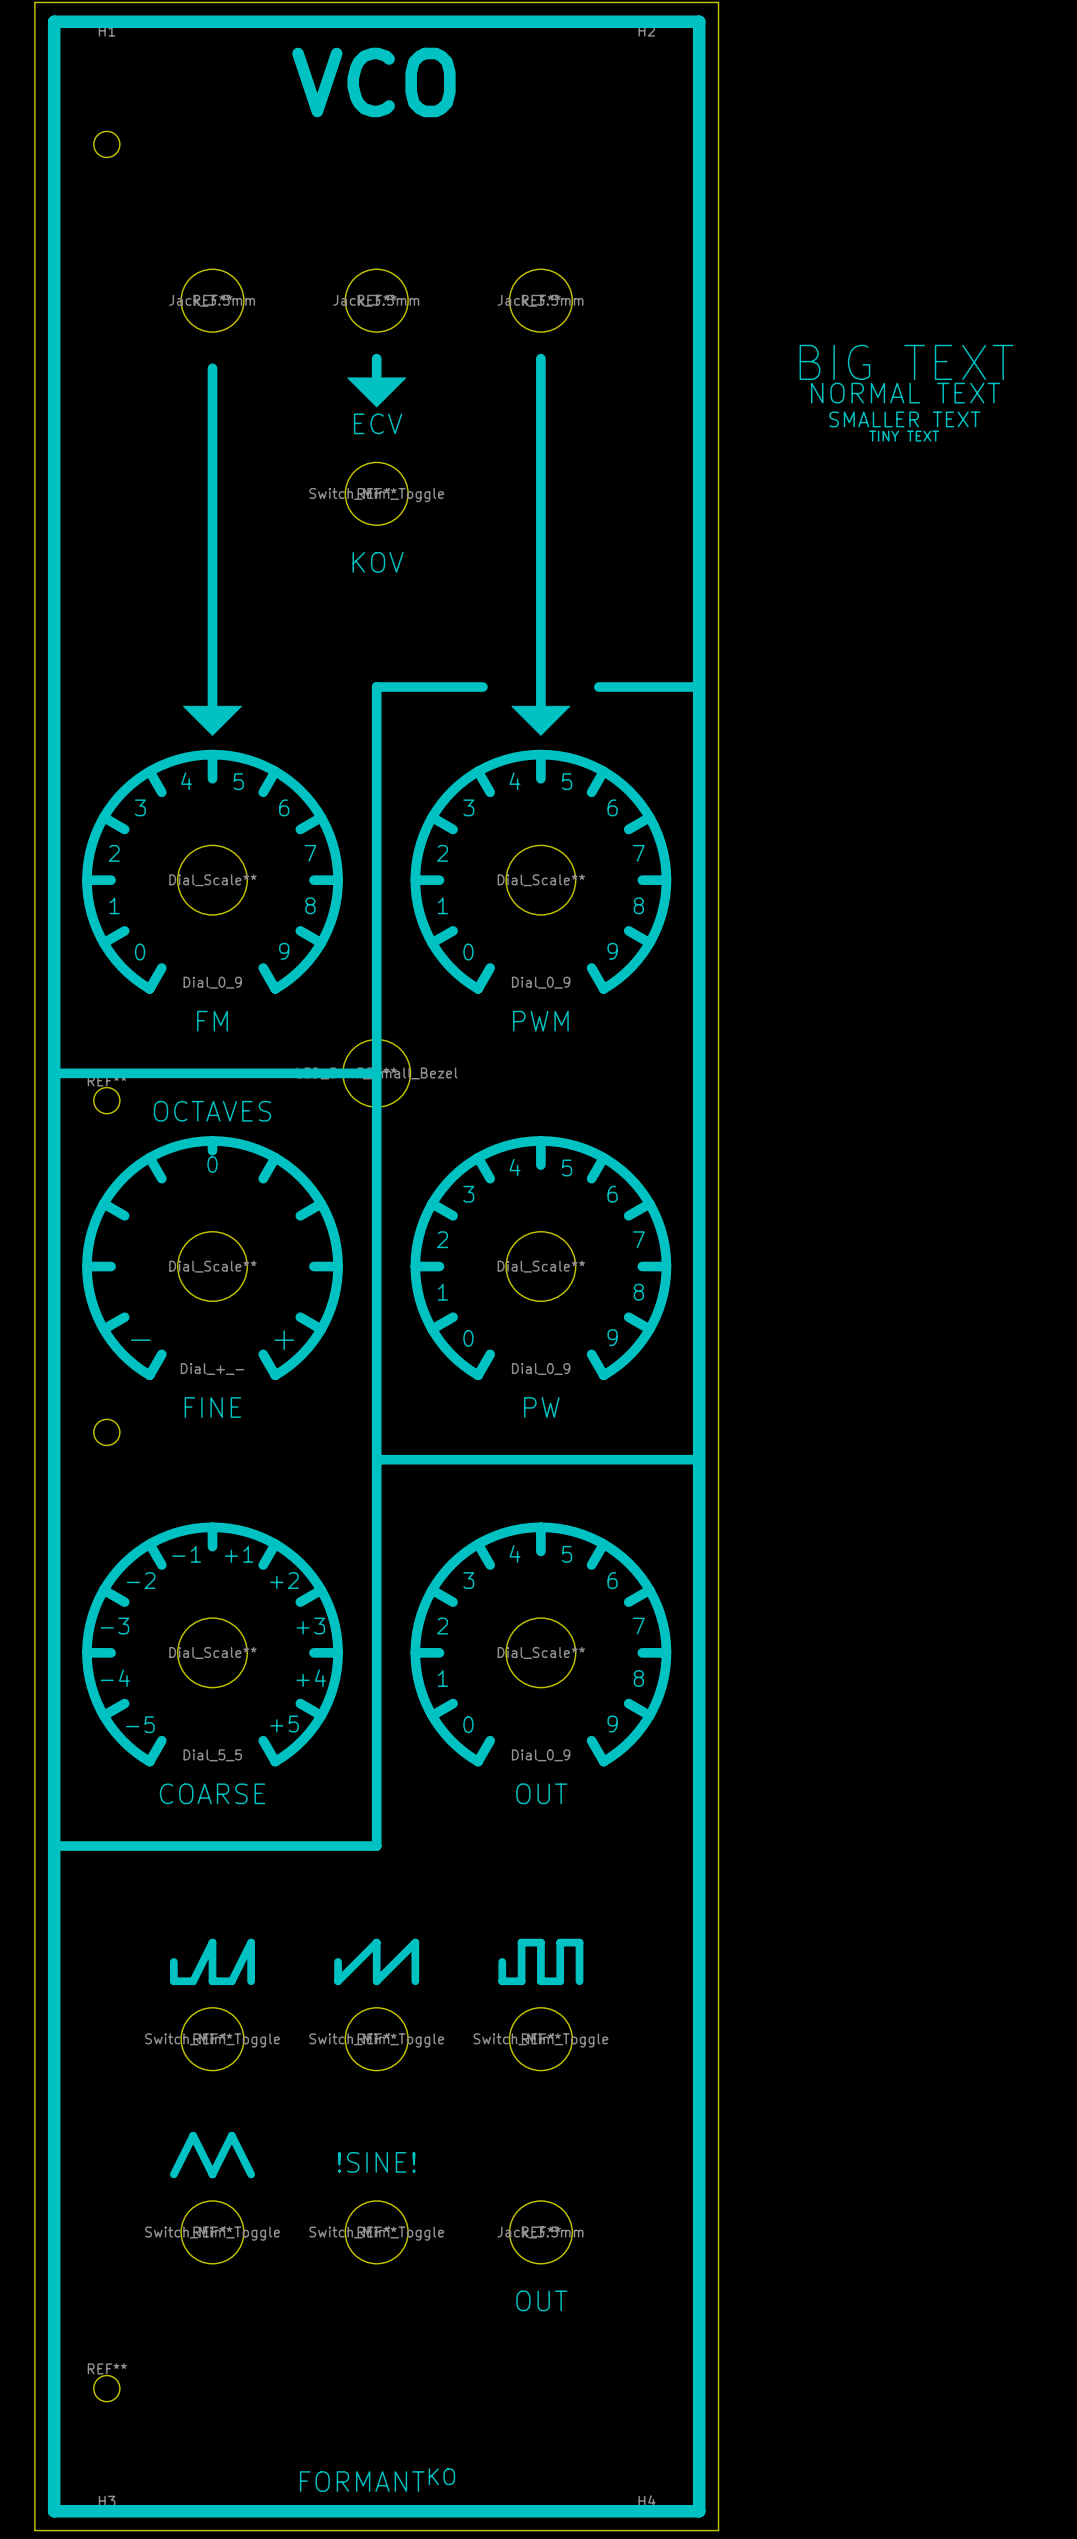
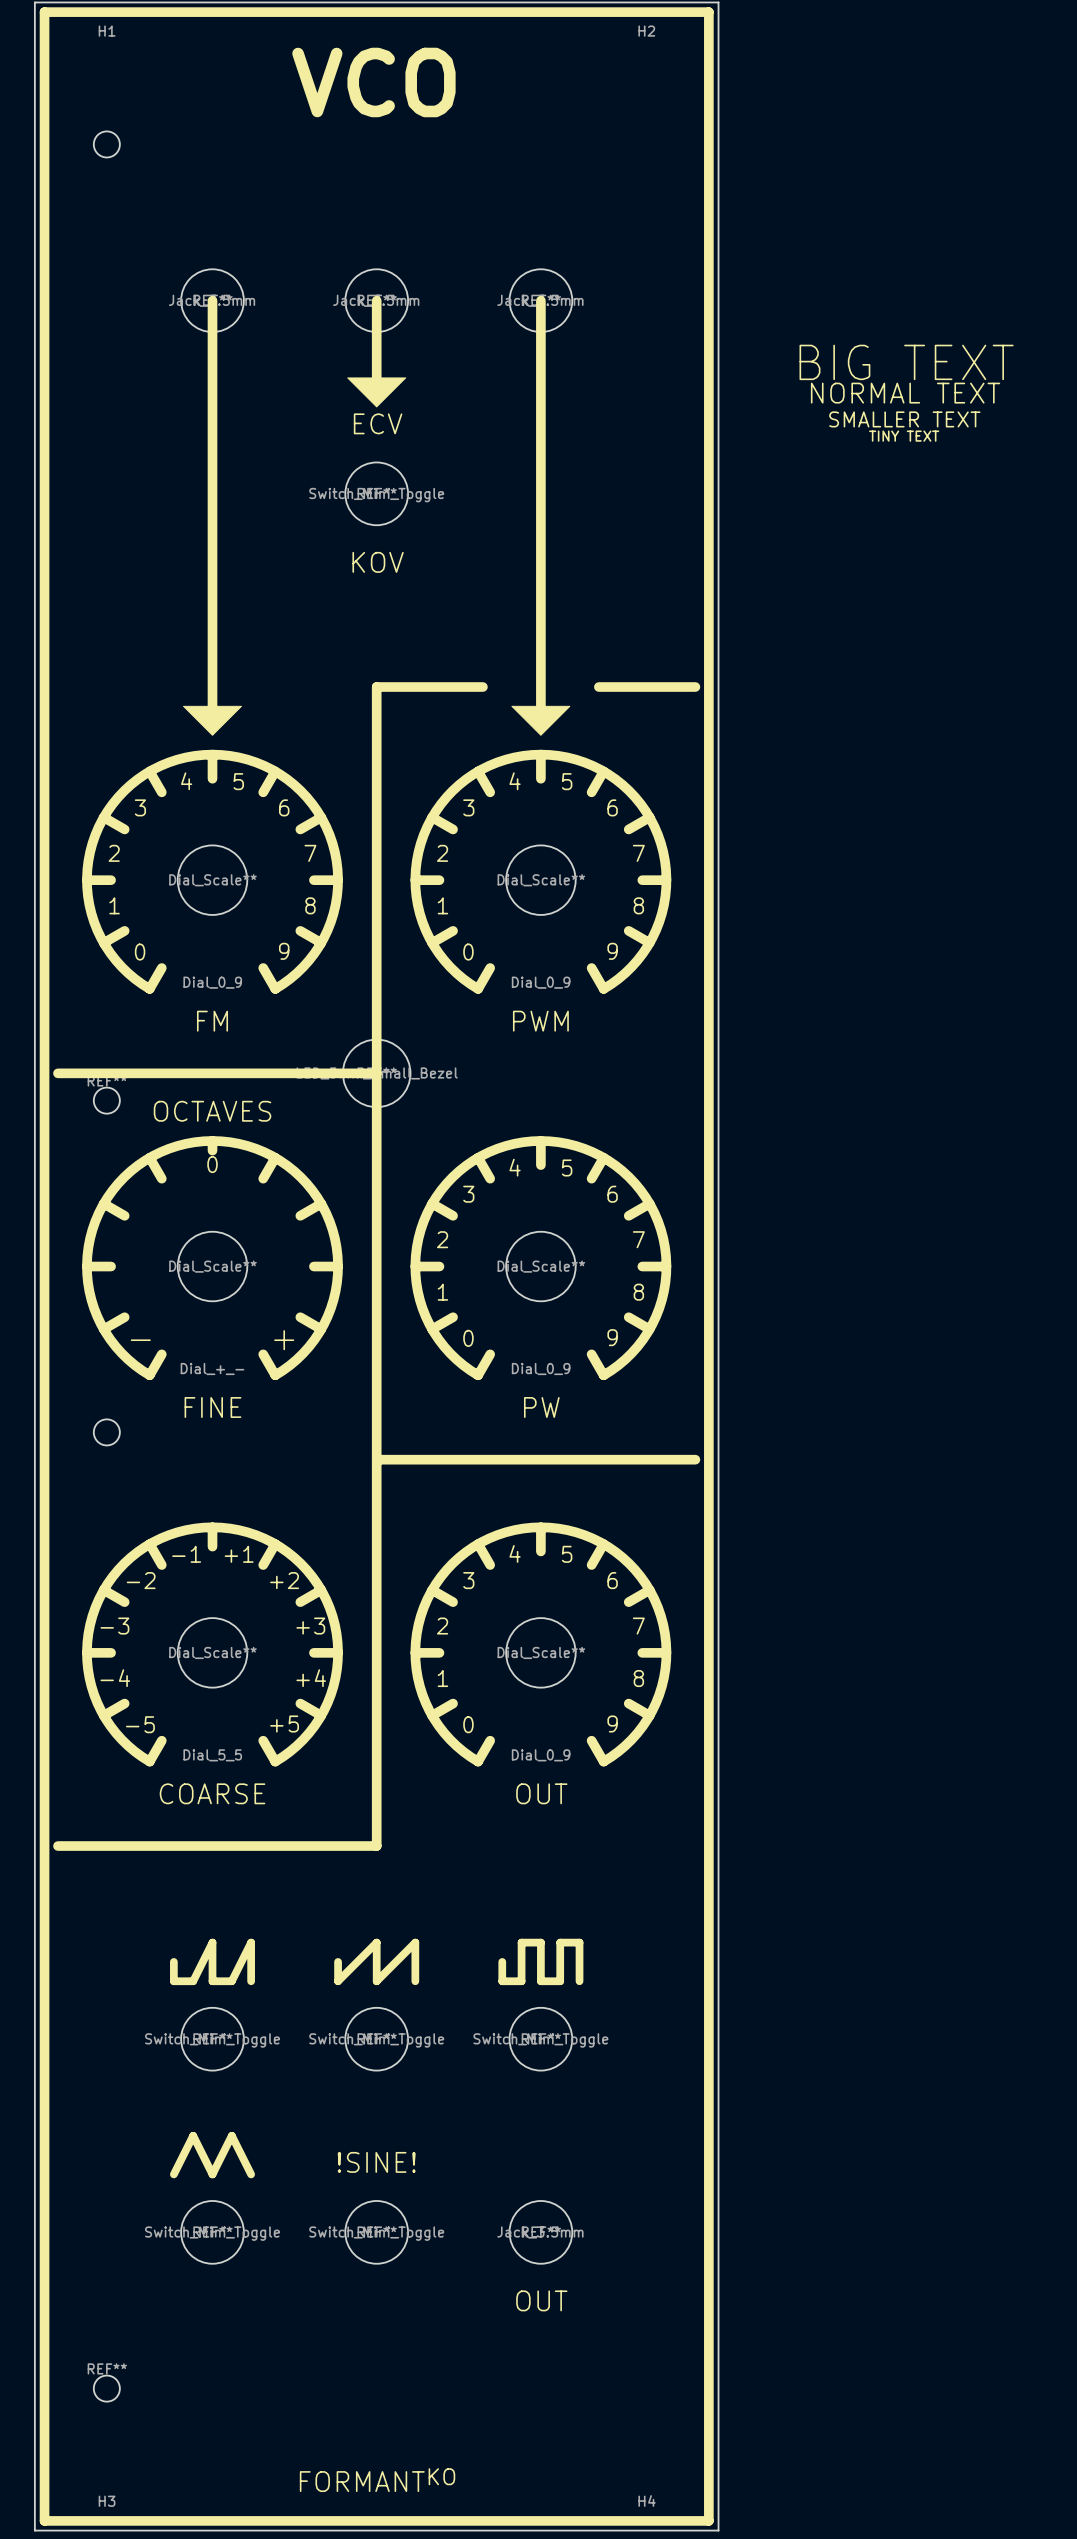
line: (54, 21) (699, 21) (699, 2511) (54, 2511) (54, 21) -> (44, 12) (44, 2520) (708, 2520) (708, 12) (44, 12)
line: none -> (212, 300) (212, 368)
line: none -> (376, 300) (376, 358)
line: none -> (540, 300) (540, 358)

